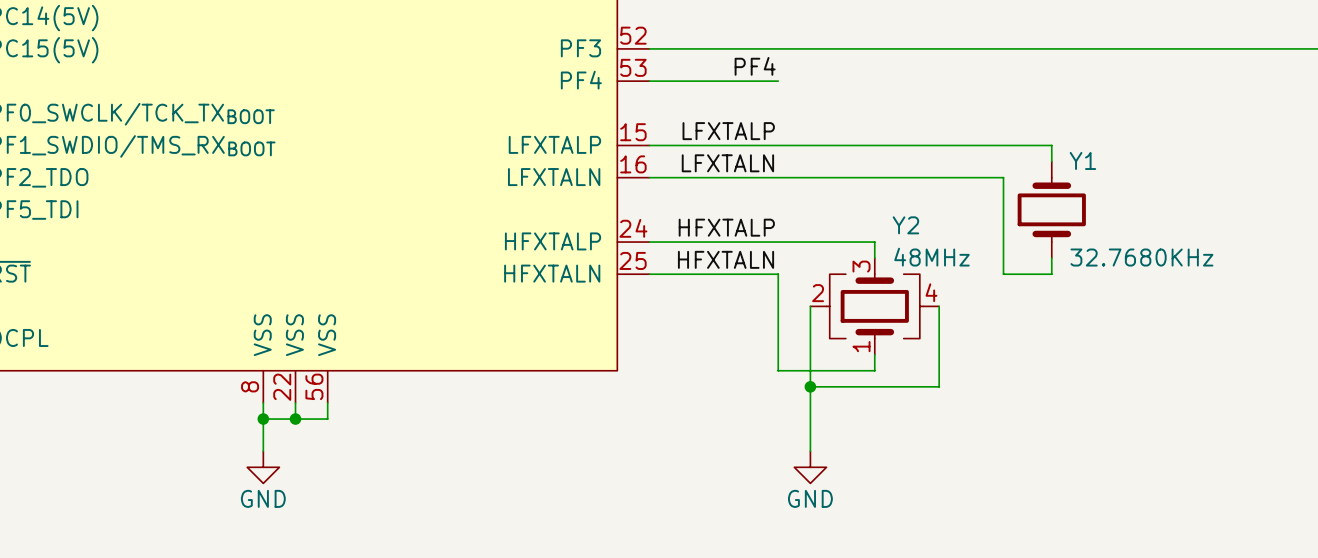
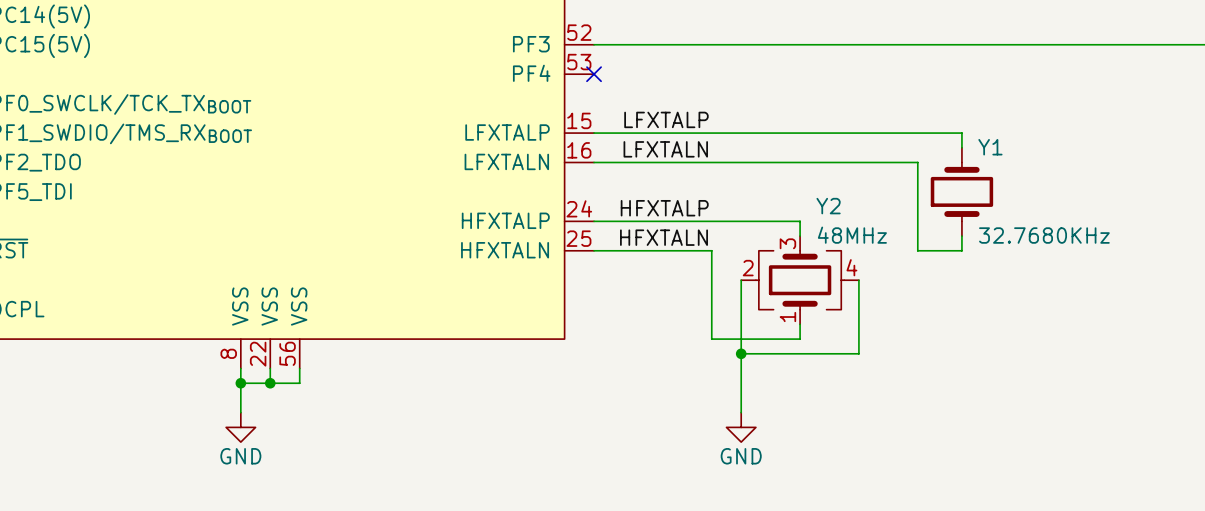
label: PF4 (755, 66) -> none
wire: (649, 81) (778, 81) -> none
no-connect mark: none -> (594, 74)

